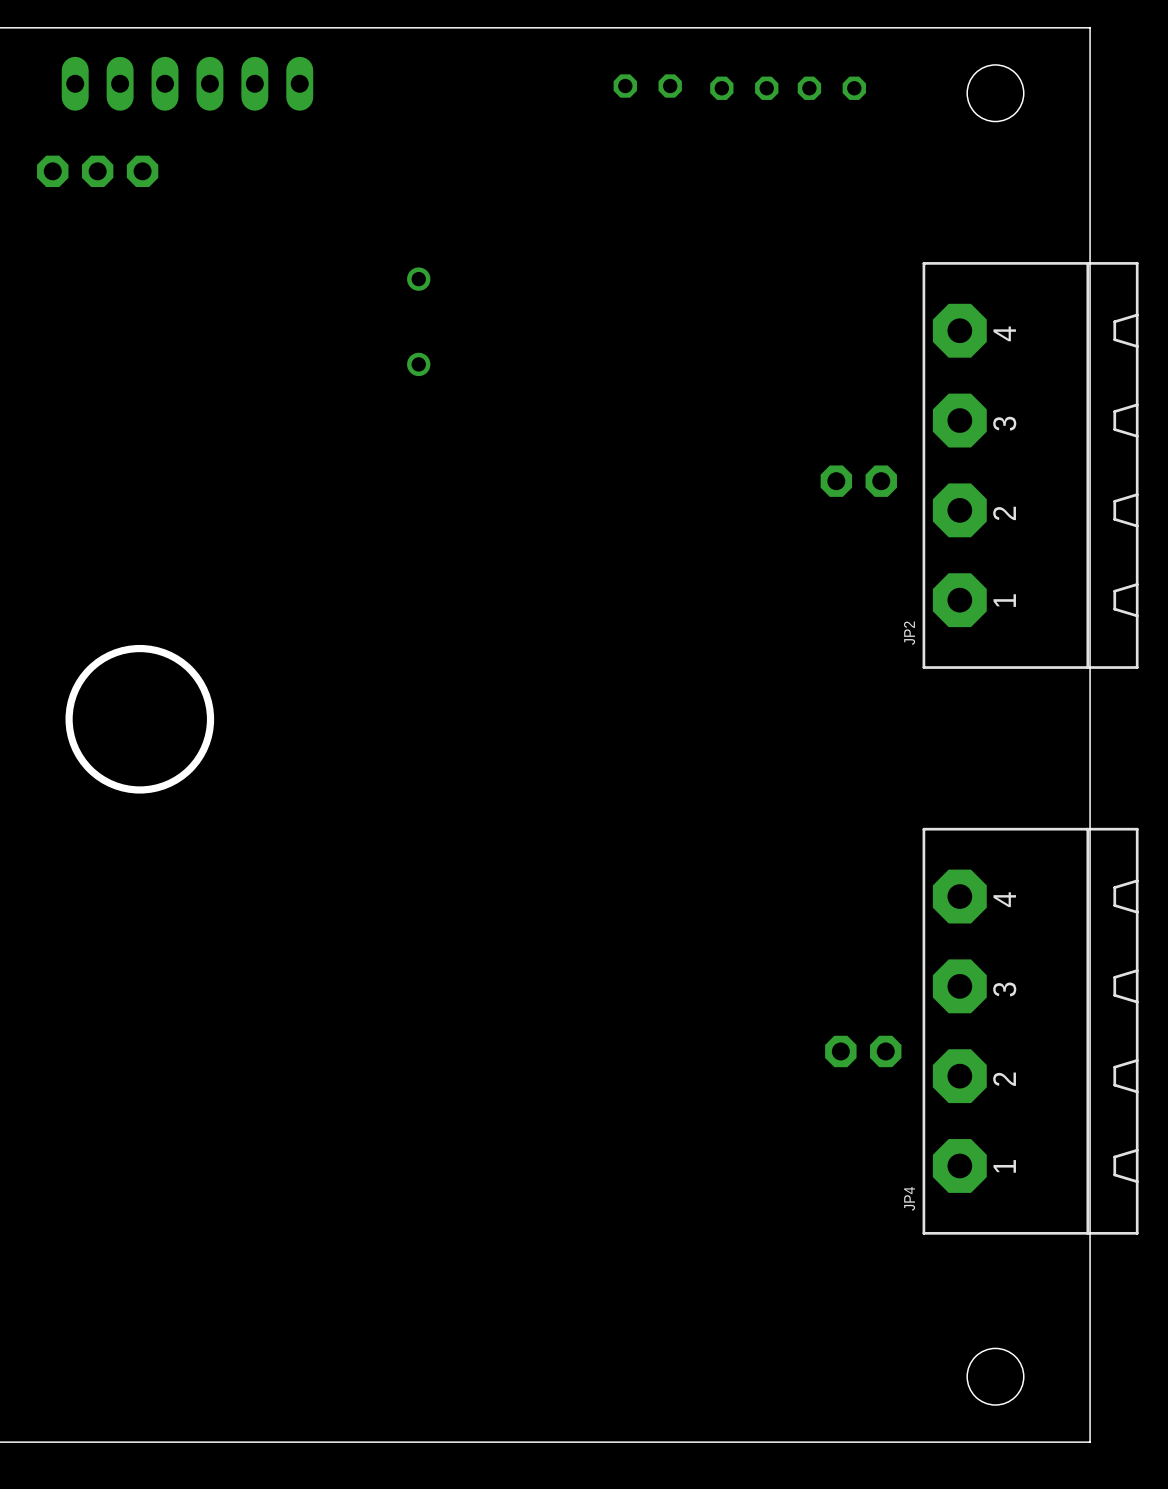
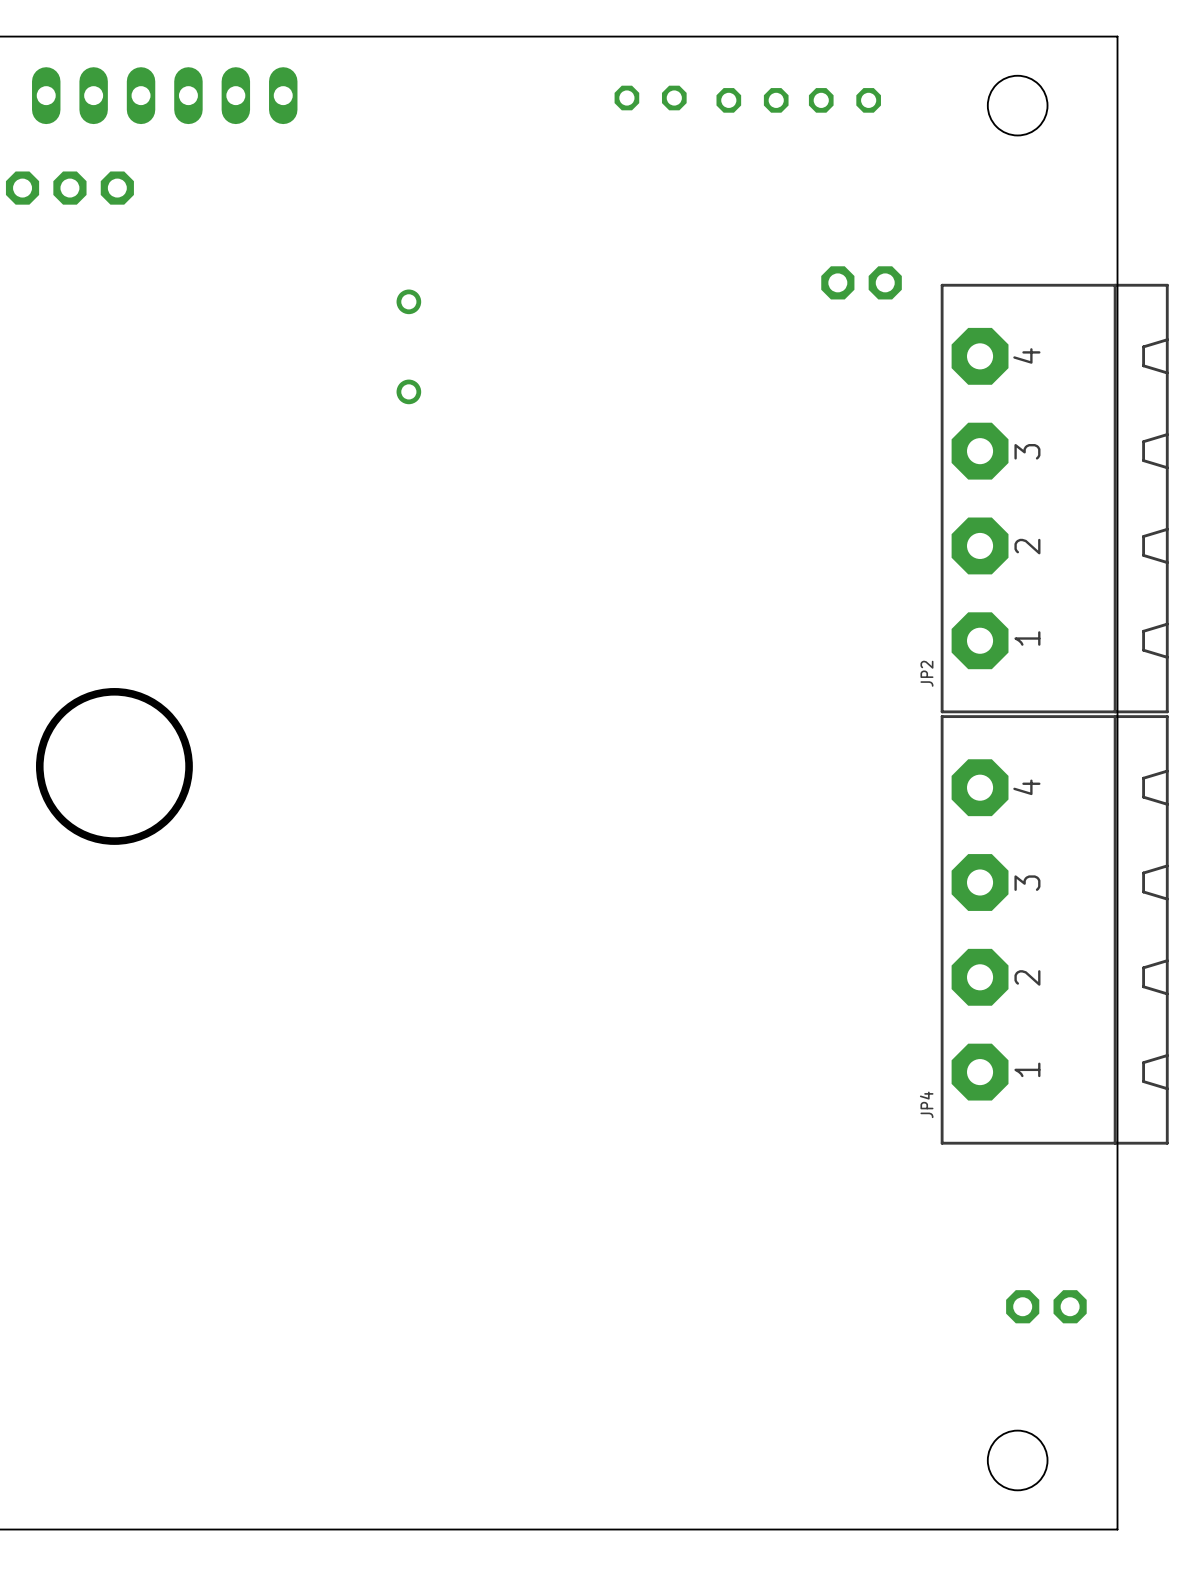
part position: (858, 481) -> (861, 282)
JP4 position: (1030, 1031) -> (1054, 929)
part position: (863, 1051) -> (1046, 1306)

